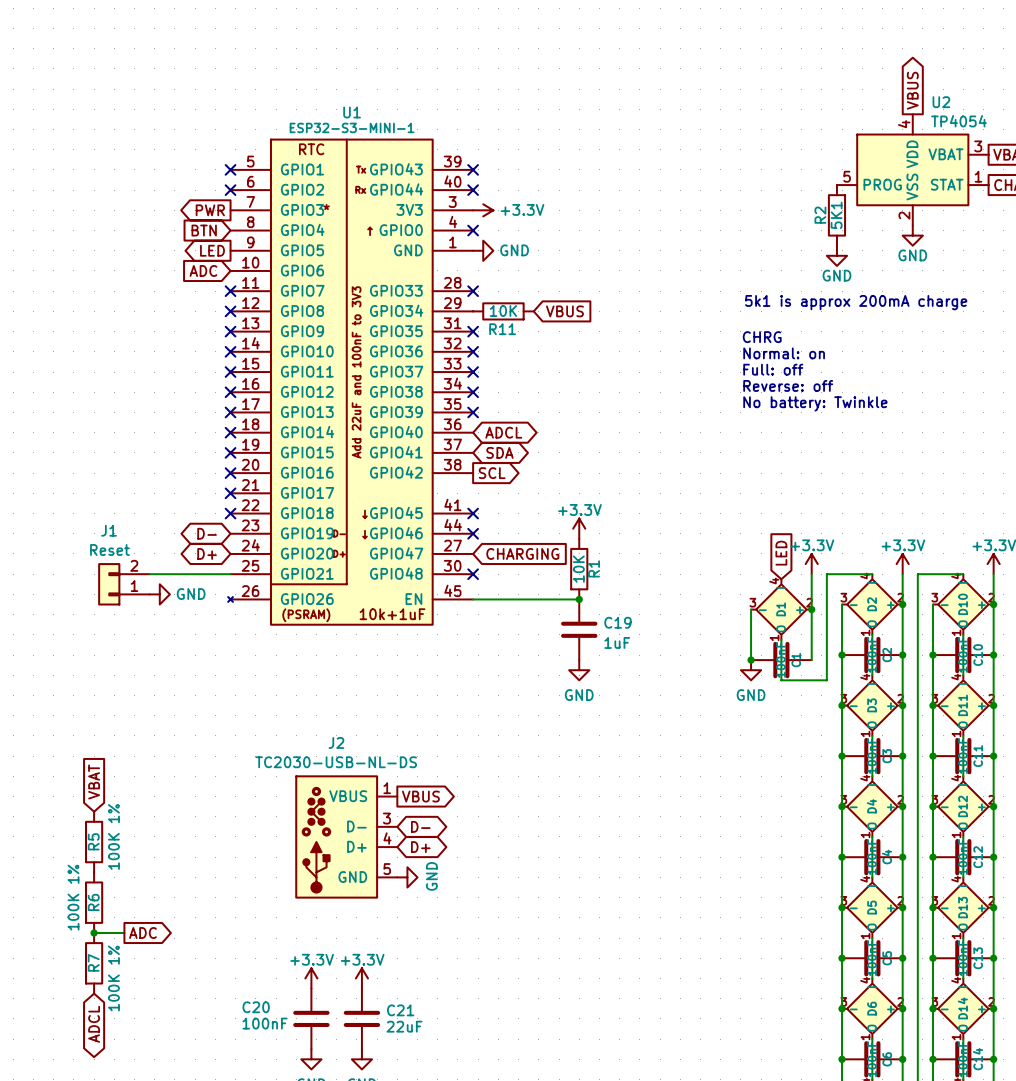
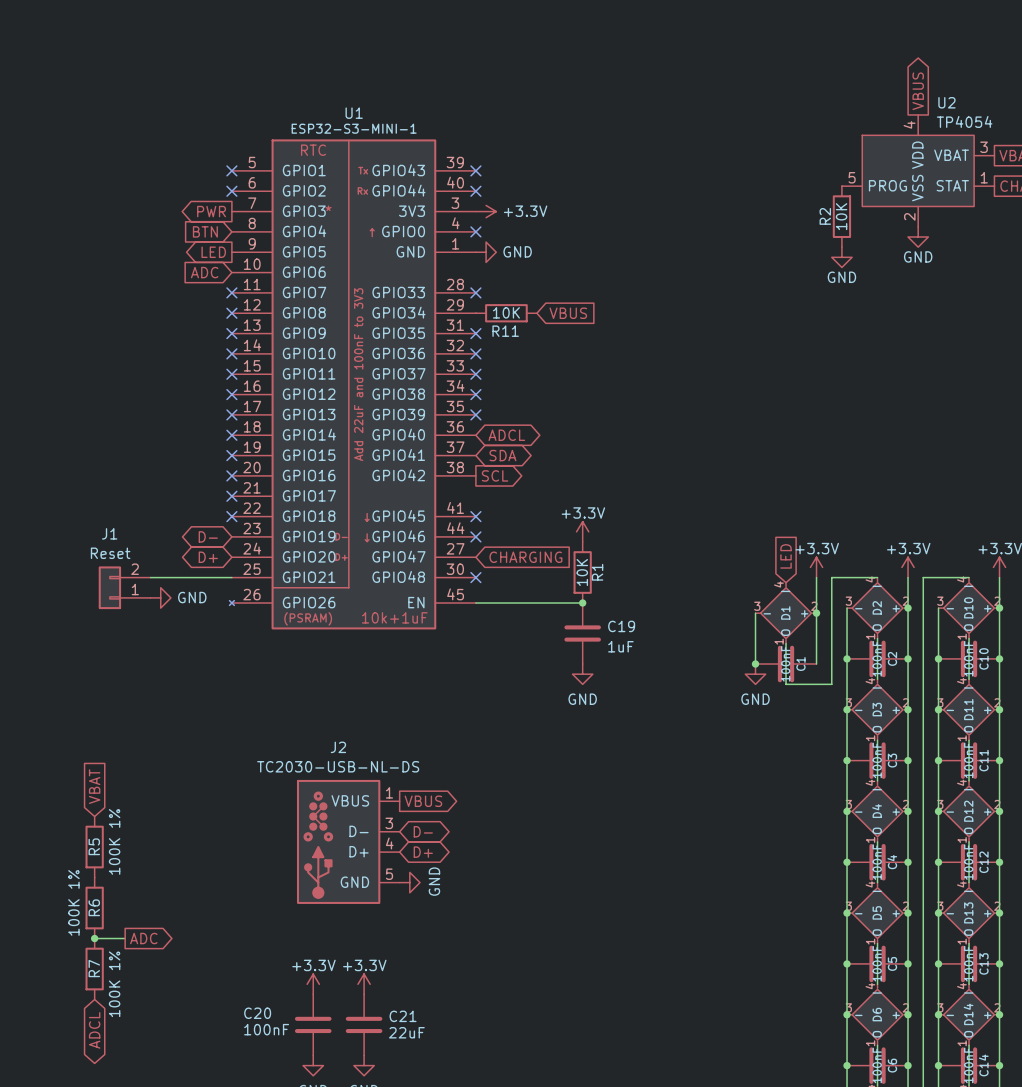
R2 value: 5K1 (836, 215) -> 10K (841, 216)
text: 5k1 is approx 200mA charge (856, 302) -> none
text: CHRG (762, 337) -> none
text: Normal: on (784, 353) -> none
text: Full: off (773, 369) -> none
text: Reverse: off (788, 385) -> none
text: No battery: Twinkle (815, 403) -> none

